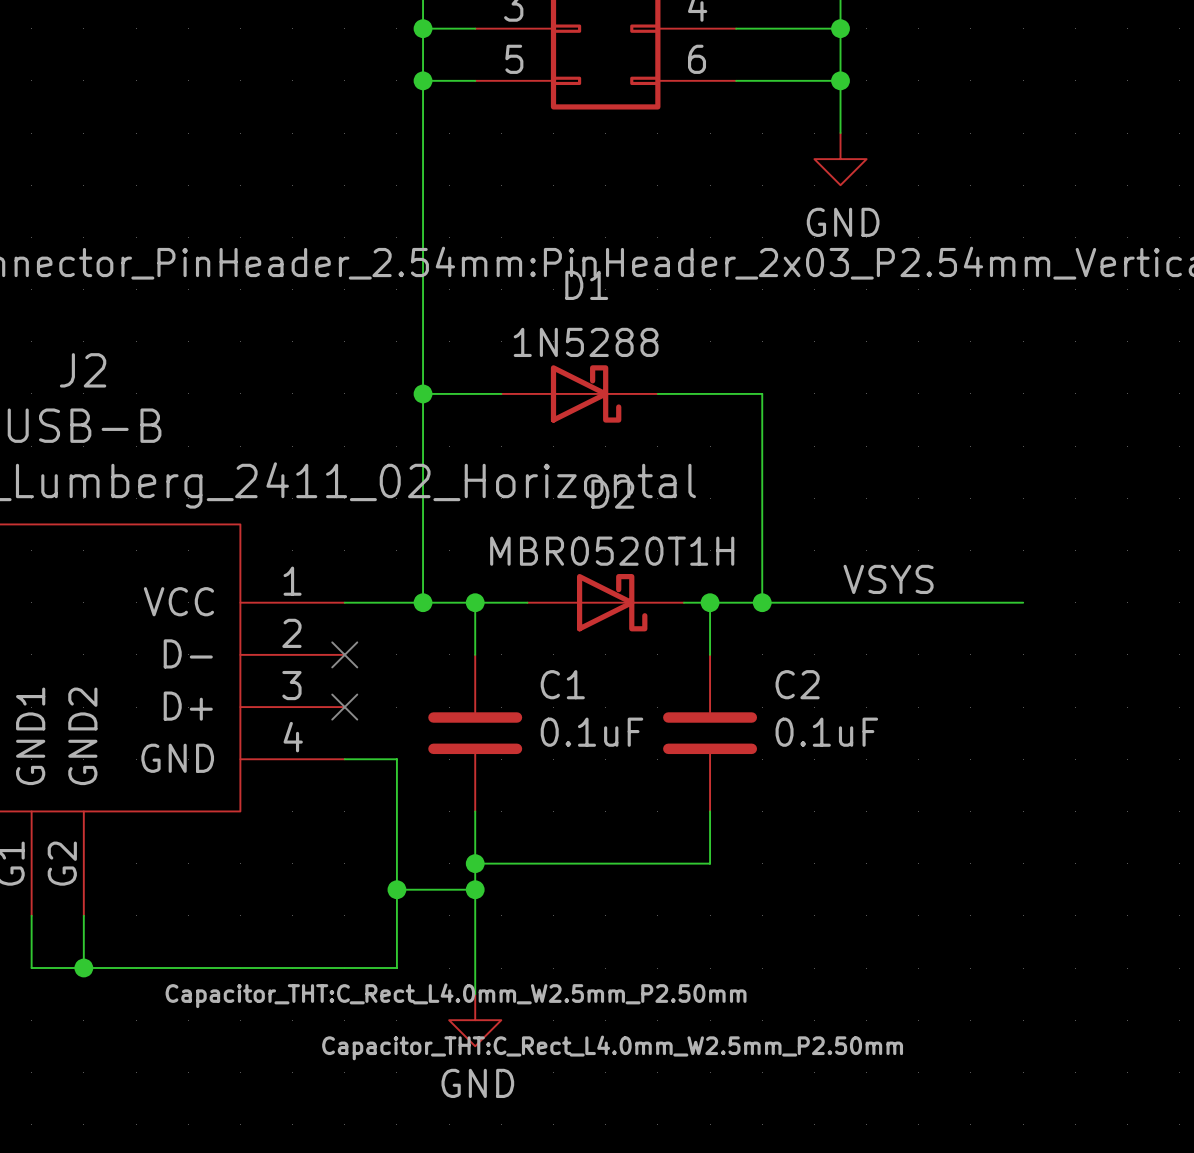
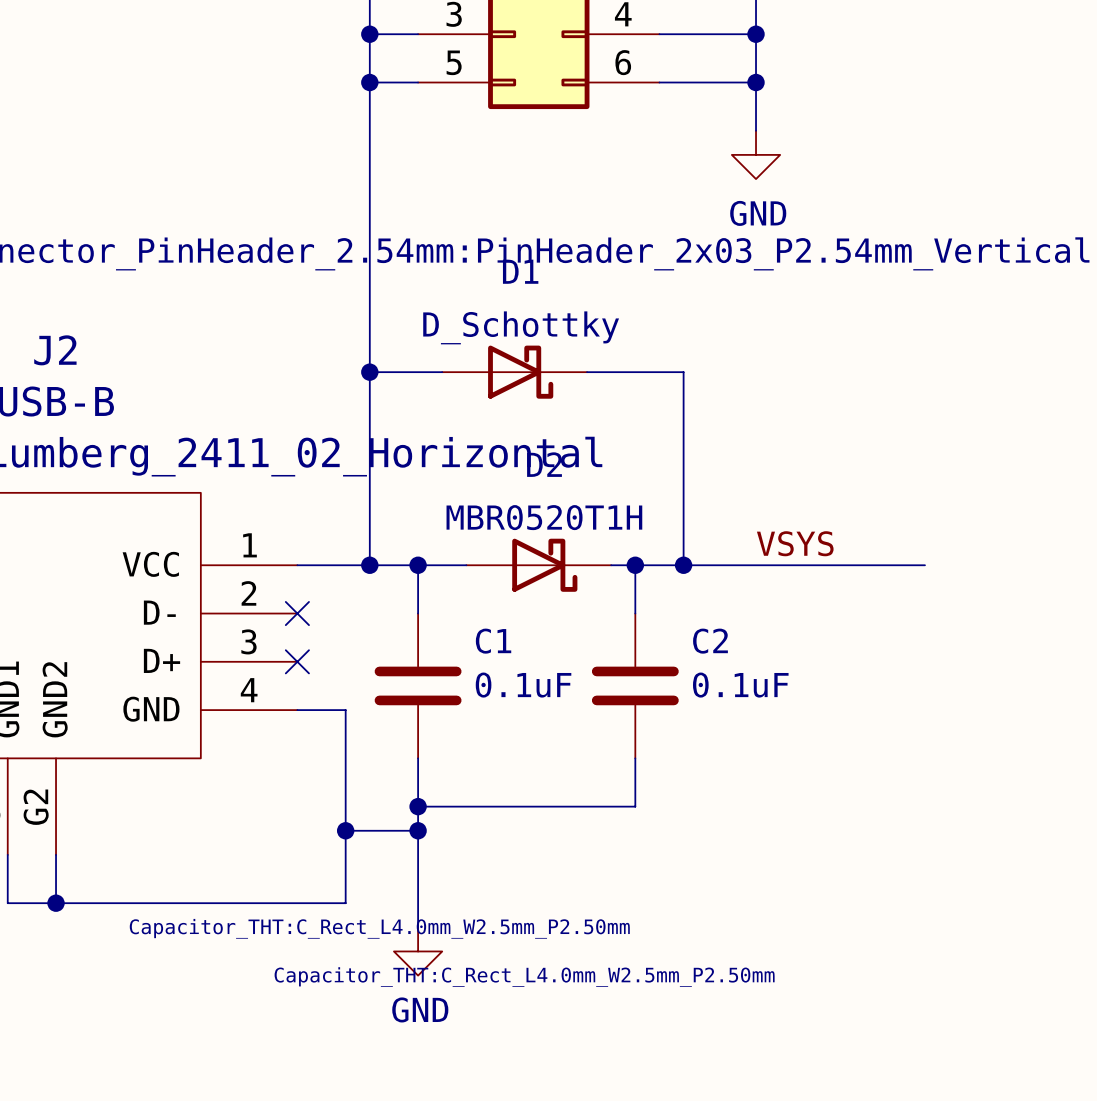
D1 value: 1N5288 (586, 342) -> D_Schottky (521, 327)

